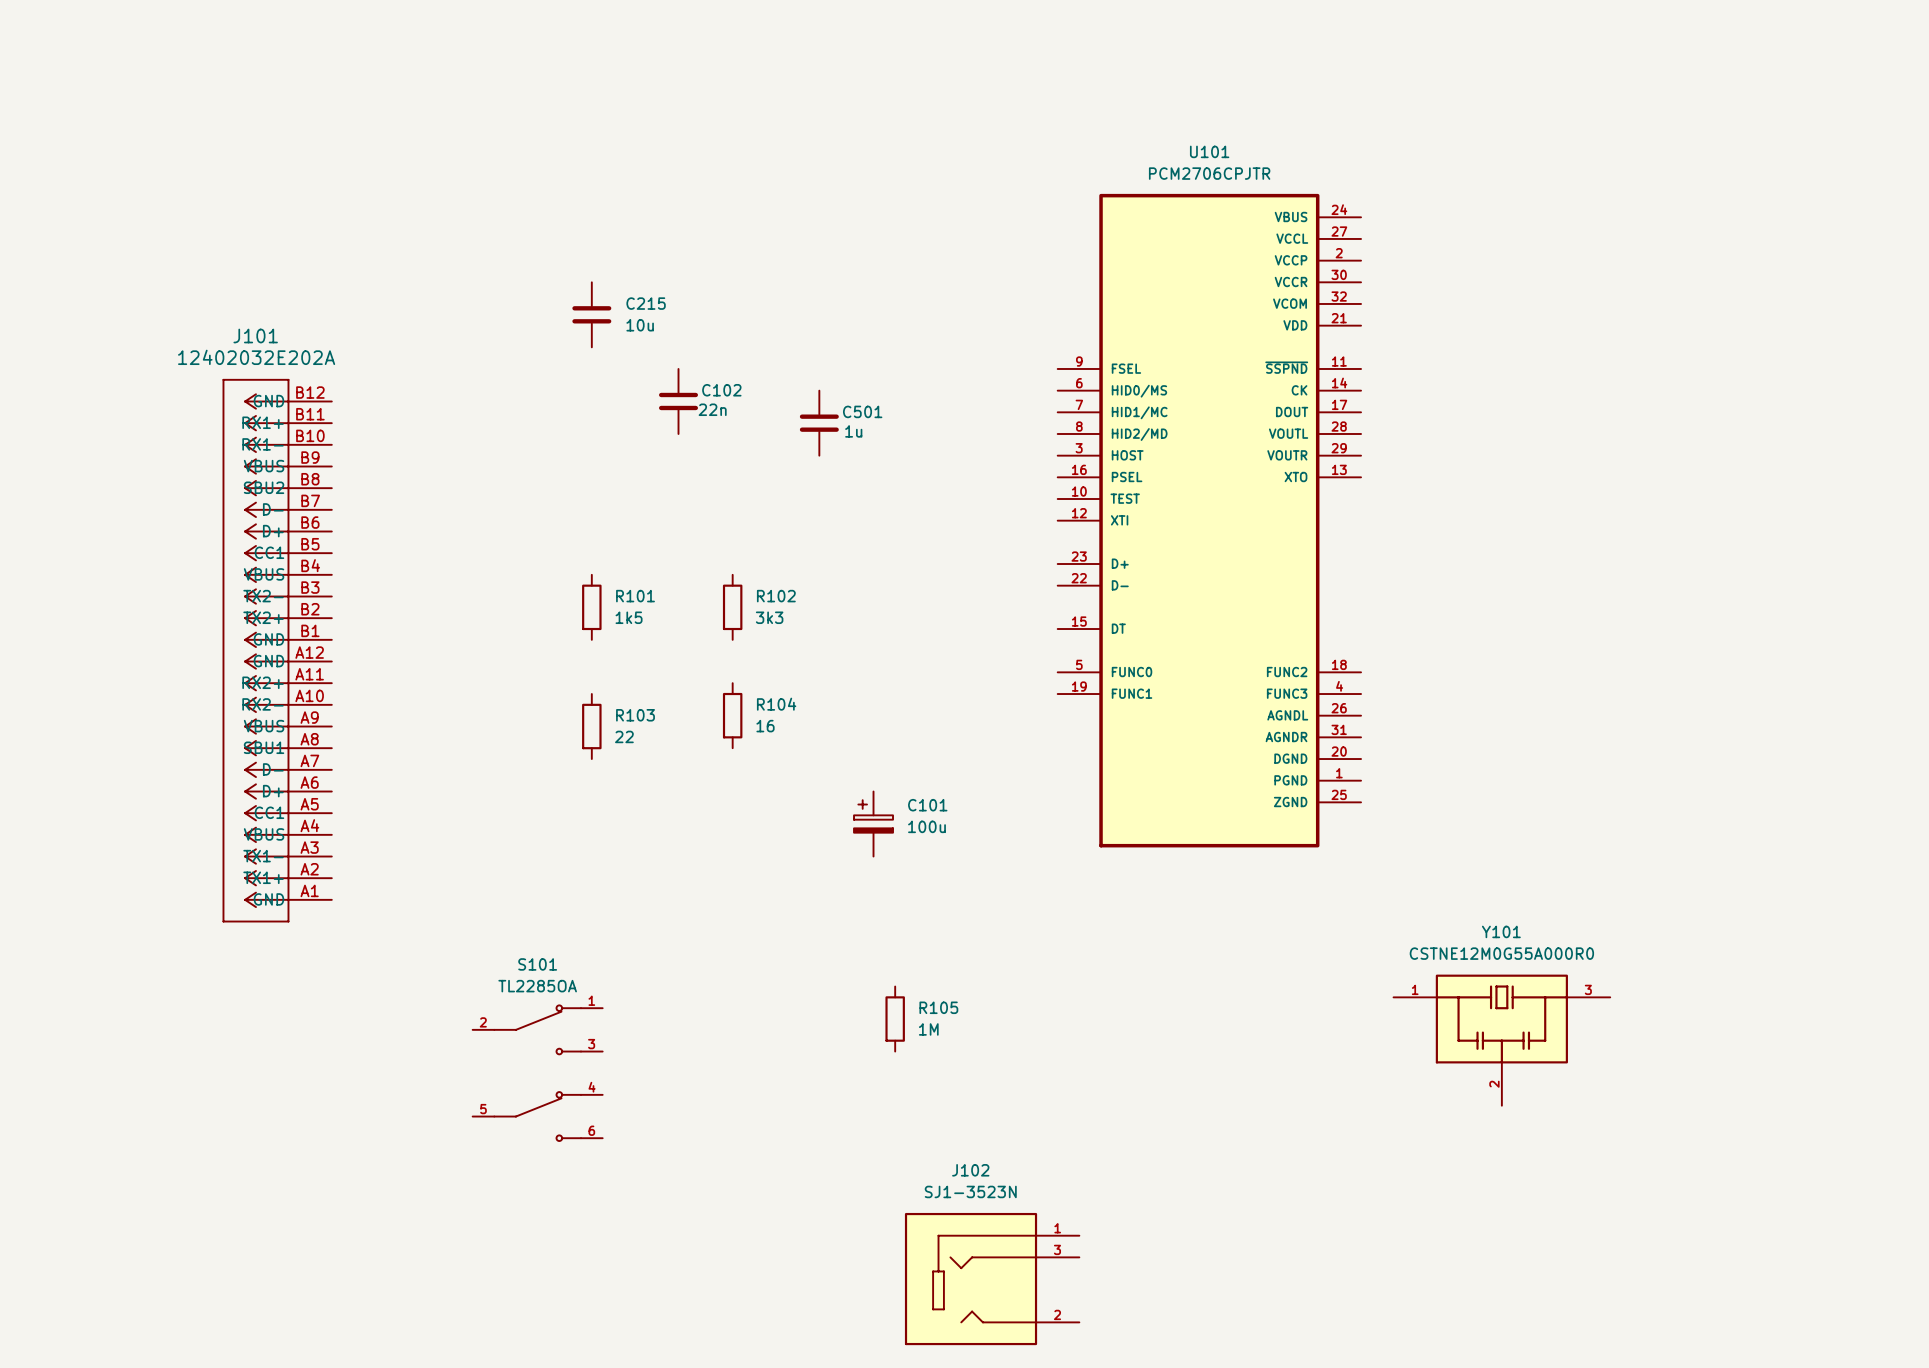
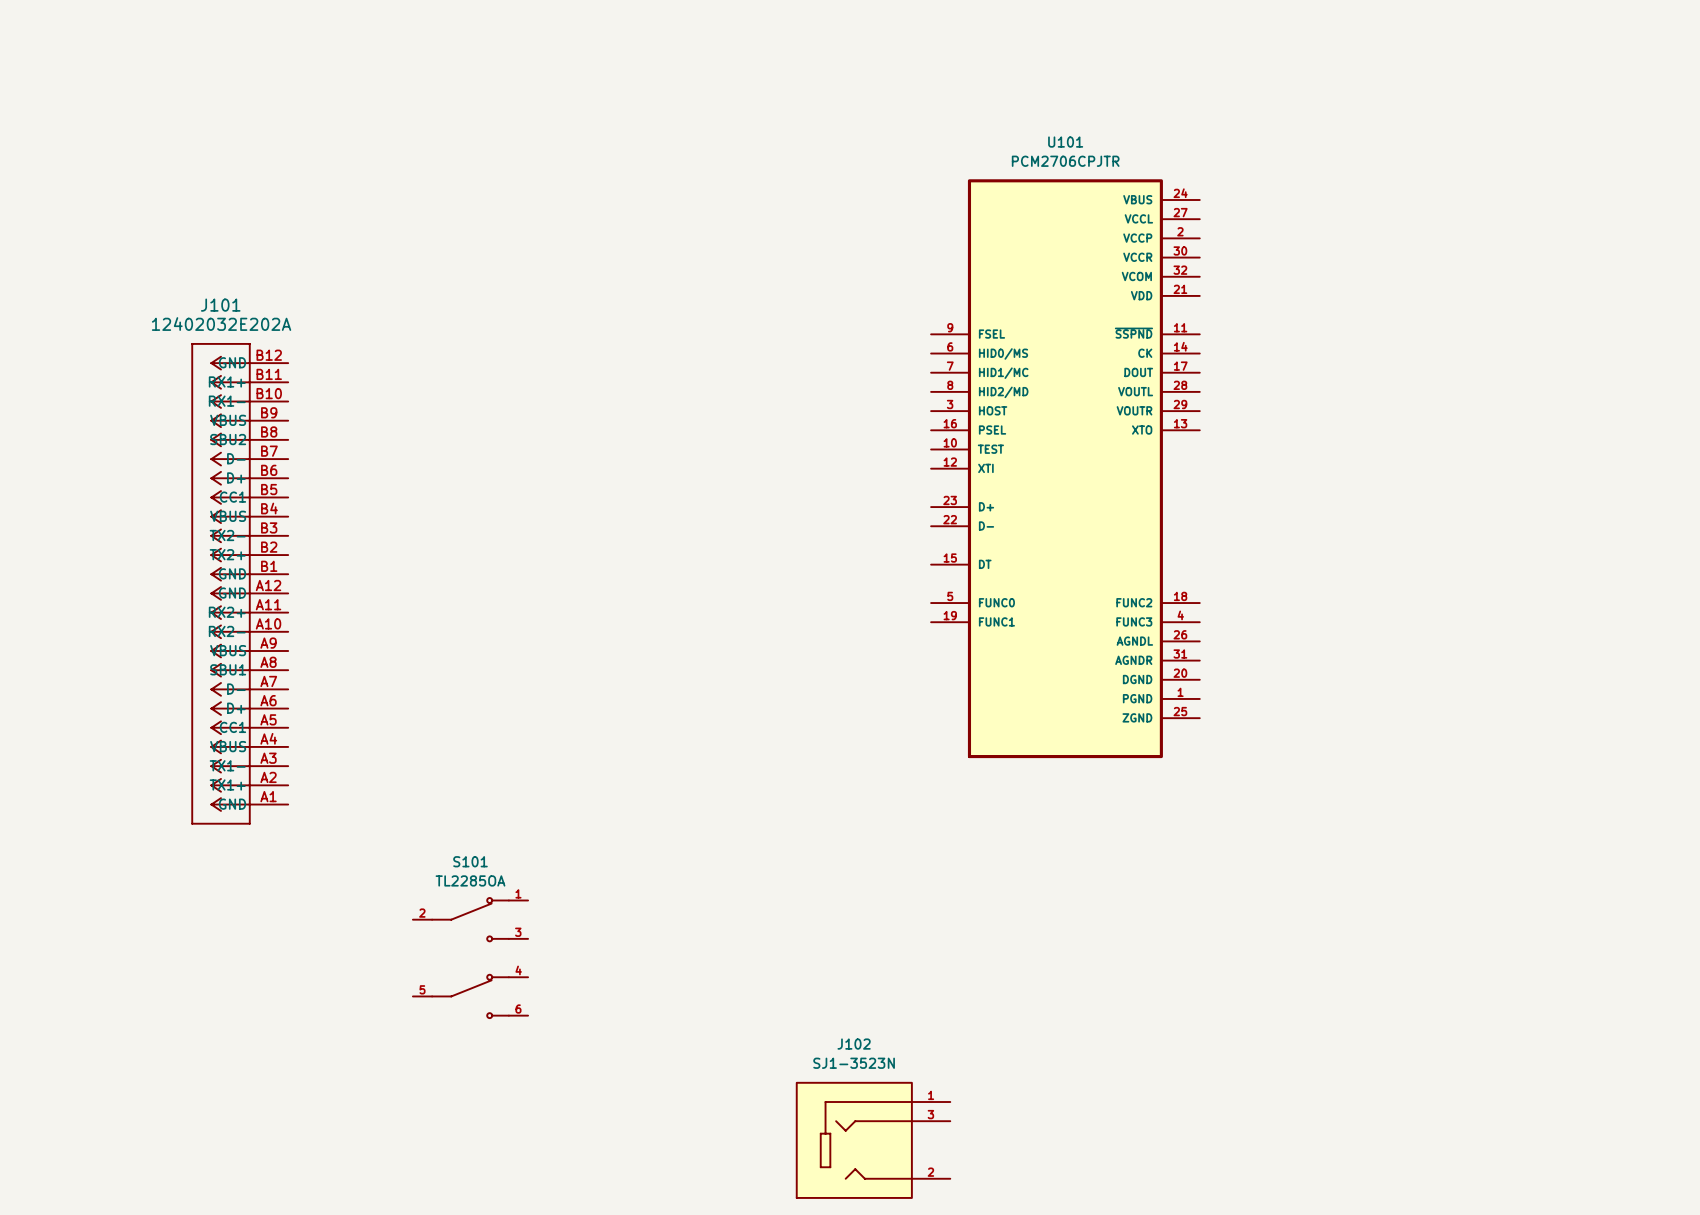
C215: 10u (591, 314) -> none
C102: 22n (678, 401) -> none
C501: 1u (819, 423) -> none
R101: 1k5 (591, 607) -> none
R102: 3k3 (732, 607) -> none
R104: 16 (732, 715) -> none
R103: 22 (591, 726) -> none
C101: 100u (873, 824) -> none
R105: 1M (895, 1019) -> none
Y101: CSTNE12M0G55A000R0 (1501, 1040) -> none

